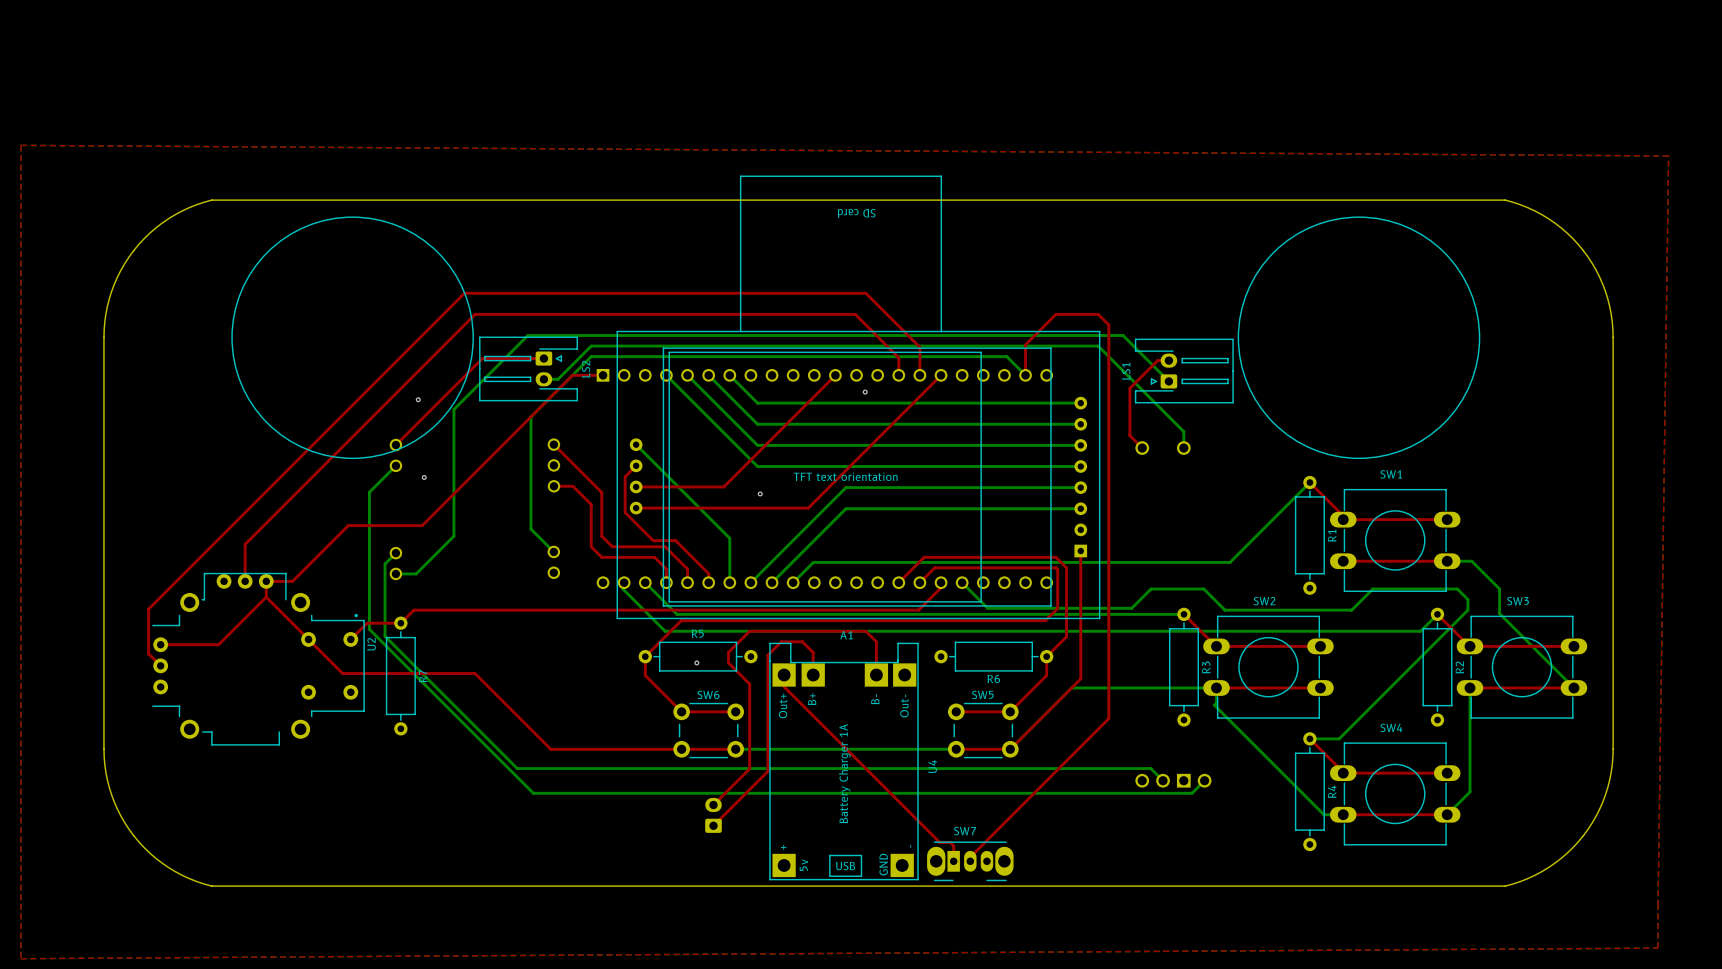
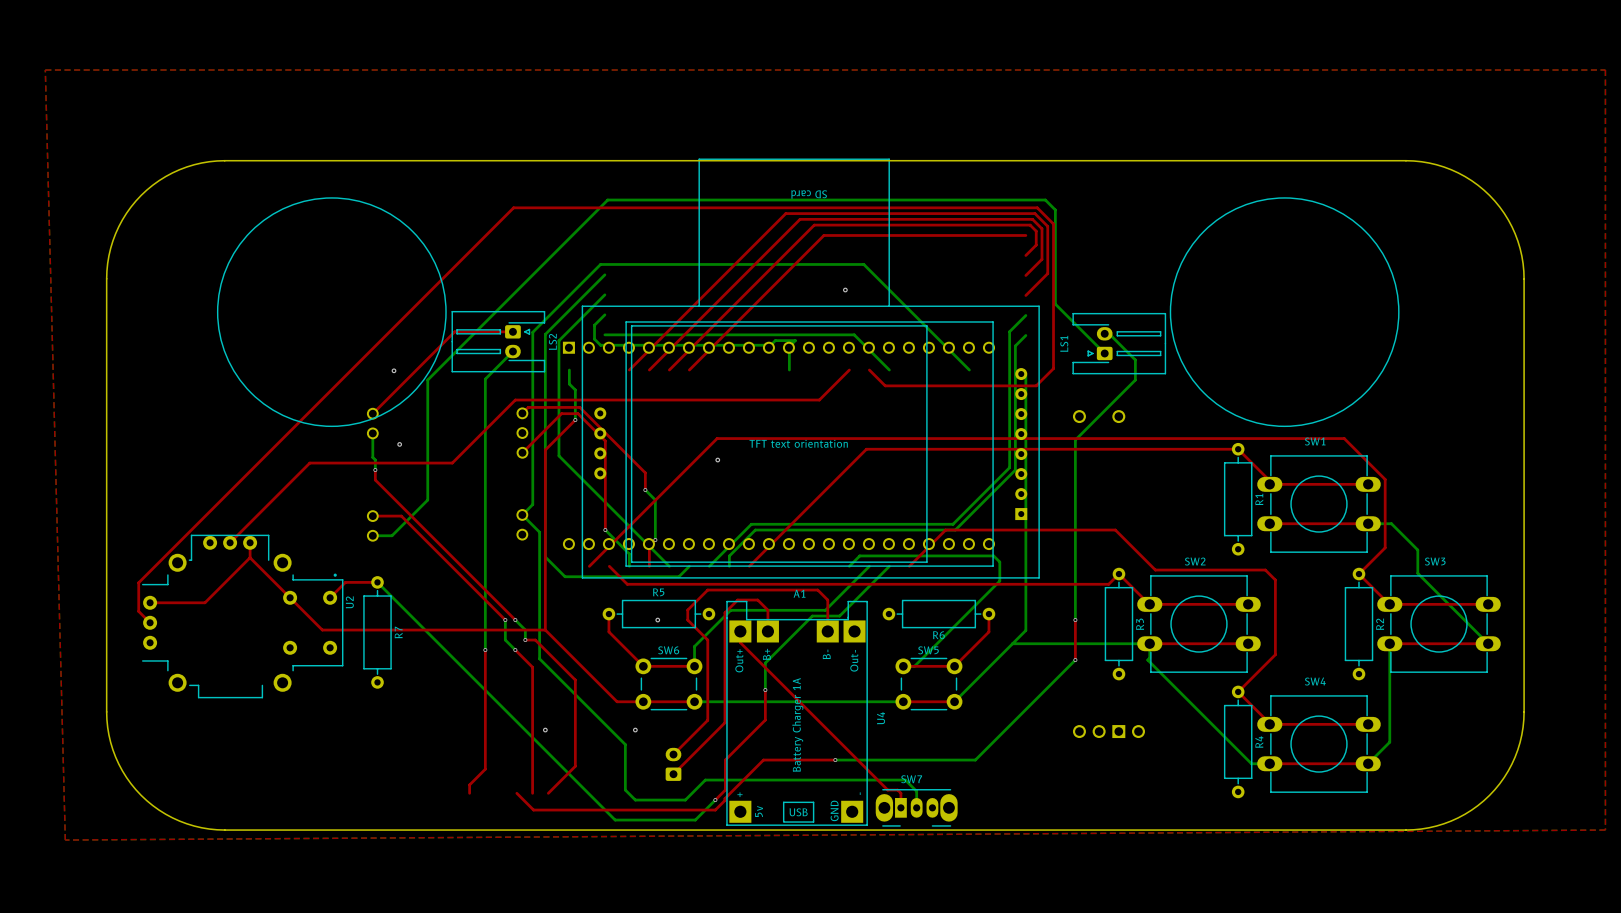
top zone outline: (20, 145) (1668, 155) (1658, 948) (20, 958) (20, 145) -> (45, 70) (65, 840) (1605, 830) (1605, 70) (45, 70)
board edge: (211, 200) (1505, 200) (1527, 207) (1561, 228) (1583, 250) (1602, 284) (1612, 321) (1613, 749) (1611, 772) (1602, 802) (1583, 835) (1561, 858) (1534, 875) (1505, 886) (211, 886) (189, 878) (161, 862) (133, 835) (117, 809) (105, 772) (103, 749) (104, 329) (107, 306) (114, 284) (124, 263) (138, 244) (155, 228) (175, 214) (211, 200) -> (224, 160) (209, 161) (186, 166) (165, 176) (146, 190) (131, 206) (118, 226) (110, 248) (106, 271) (107, 727) (112, 749) (126, 777) (146, 800) (172, 817) (201, 827) (224, 830) (1413, 829) (1443, 823) (1471, 810) (1494, 789) (1511, 764) (1521, 734) (1524, 711) (1523, 271) (1517, 241) (1504, 213) (1483, 190) (1458, 172) (1436, 164) (1405, 160) (224, 160)
top track: none -> (1025, 235) (823, 235) (689, 370)
top track: none -> (1025, 255) (1036, 245) (1036, 231) (1030, 225) (814, 225) (669, 370)
bottom track: none -> (604, 274) (545, 334) (545, 557) (565, 576) (678, 576) (689, 566)
top track: none -> (1025, 275) (1041, 259) (1041, 228) (1032, 219) (800, 219) (649, 370)
via: none -> (845, 290)
bottom track: none -> (604, 294) (558, 340) (558, 455) (669, 566)
top track: none -> (1025, 295) (1047, 273) (1047, 226) (1034, 213) (785, 213) (629, 370)
bottom track: (527, 335) (1123, 335) -> (497, 310) (607, 200) (1045, 200) (1055, 210) (1055, 304) (1061, 310)
bottom track: none -> (604, 314) (594, 325) (594, 339) (600, 345) (770, 345) (775, 340) (795, 340) (789, 346) (789, 370)
bottom track: none -> (1025, 315) (1009, 331) (1009, 467) (953, 524) (751, 524) (709, 566)
top track: (1168, 360) (1157, 360) (1129, 388) (1129, 435) (1142, 448) -> none
bottom track: none -> (1104, 333) (1109, 333) (1135, 360) (1135, 380) (1075, 440) (1075, 620)
bottom track: none -> (604, 334) (854, 334) (889, 370)
bottom track: none -> (1025, 335) (1015, 345) (1015, 470) (955, 530) (755, 530) (729, 556) (729, 566)
top track: (603, 375) (572, 375) (422, 525) (348, 525) (292, 581) (266, 581) -> none
bottom track: (666, 375) (757, 466) (1080, 466) -> none
bottom track: (687, 375) (757, 445) (1080, 445) -> none
bottom track: (708, 375) (757, 424) (1080, 424) -> none
bottom track: (729, 375) (757, 403) (1080, 403) -> none
top track: (835, 375) (723, 486) (636, 486) -> none
top track: (898, 375) (898, 357) (855, 314) (475, 314) (245, 544) (245, 581) -> (849, 370) (819, 400) (515, 400) (452, 463) (309, 463) (230, 542)
top track: (919, 375) (919, 347) (865, 293) (464, 293) (148, 609) (148, 623) -> (869, 370) (885, 385) (1036, 385) (1053, 368) (1053, 224) (1037, 207) (513, 207) (138, 582)
top track: (941, 375) (808, 508) (636, 508) -> none
top track: (1025, 375) (1025, 344) (1055, 314) (1098, 314) (1108, 324) (1108, 718) (970, 857) (970, 861) -> none
bottom track: (1025, 375) (1006, 356) (591, 356) (530, 416) (530, 529) (553, 551) -> none
bottom track: (543, 379) (557, 379) (591, 346) (1098, 346) (1183, 431) (1183, 448) -> (512, 351) (485, 379) (485, 650)
via: (865, 392) -> none
bottom track: none -> (569, 370) (569, 384) (575, 390) (575, 420)
bottom track: none -> (969, 370) (863, 264) (600, 264) (532, 332) (532, 504) (522, 514) (539, 532) (539, 658) (625, 744) (625, 790) (635, 800) (685, 800) (705, 780) (905, 780) (916, 791) (916, 807)
bottom track: none -> (1025, 375) (1025, 630) (1012, 643)
top track: (553, 444) (601, 492) (601, 536) (612, 546) (665, 546) (687, 569) (687, 582) -> (522, 413) (528, 407) (579, 407) (645, 472) (645, 490)
bottom track: (636, 444) (729, 538) (729, 582) -> none
top track: none -> (575, 420) (545, 450) (545, 630)
via: none -> (575, 420)
bottom track: (395, 465) (369, 492) (369, 629) (533, 793) (1192, 793) (1204, 780) -> (372, 433) (372, 457) (375, 460) (375, 470)
top track: (636, 465) (625, 476) (625, 512) (653, 540) (675, 540) (708, 573) (708, 582) -> none
top track: none -> (1238, 449) (866, 449) (749, 566)
bottom track: (1309, 482) (1230, 562) (813, 562) (793, 582) -> none
top track: (553, 486) (573, 486) (591, 504) (591, 546) (601, 557) (654, 557) (666, 569) (666, 582) -> (522, 452) (561, 413) (577, 413) (605, 441) (605, 530)
bottom track: (1080, 487) (845, 487) (750, 582) -> none
top track: none -> (375, 470) (375, 480) (515, 620)
via: none -> (375, 470)
bottom track: (1080, 508) (845, 508) (772, 582) -> none
bottom track: none -> (645, 490) (655, 500) (655, 540)
via: none -> (645, 490)
top track: (1080, 551) (1080, 678) (1014, 744) -> none
top track: none -> (372, 516) (401, 516) (505, 620)
bottom track: (395, 553) (385, 564) (385, 636) (517, 768) (1150, 768) (1163, 780) -> none
bottom track: none -> (605, 530) (629, 554) (629, 566)
via: none -> (605, 530)
top track: (1000, 567) (934, 567) (919, 582) -> (945, 530) (909, 566)
top track: (1055, 567) (1057, 569) (1057, 608) (1045, 620) (681, 620) (645, 656) -> (997, 530) (1115, 530) (1155, 570) (1265, 570) (1275, 580) (1275, 654) (1238, 691)
top track: none -> (655, 540) (649, 546) (649, 566)
via: none -> (655, 540)
bottom track: (624, 582) (622, 589) (665, 631) (1420, 631) (1437, 614) -> none
bottom track: (645, 582) (676, 614) (1183, 614) -> none
top track: (898, 582) (924, 557) (1055, 557) (1066, 567) (1066, 636) (1046, 656) -> none
top track: (941, 582) (941, 587) (918, 610) (413, 610) (400, 623) -> none
bottom track: (962, 582) (987, 608) (1131, 608) (1151, 589) (1203, 589) (1224, 610) (1351, 610) (1372, 589) (1457, 589) (1467, 599) (1467, 610) (1339, 738) (1309, 738) -> none
top track: none -> (589, 566) (717, 438) (1344, 438) (1385, 479) (1385, 547) (1358, 574)
top track: none -> (609, 566) (627, 584) (1108, 584) (1118, 574)
bottom track: none -> (849, 566) (859, 555) (993, 555) (999, 562) (999, 581) (914, 666) (903, 666)
bottom track: none -> (869, 566) (825, 610) (730, 610) (694, 646) (694, 666)
bottom track: none -> (889, 566) (839, 616) (812, 616) (765, 663) (765, 690)
bottom track: none -> (377, 582) (615, 820) (695, 820) (715, 800)
bottom track: none -> (505, 620) (505, 640) (515, 650)
via: none -> (505, 620)
bottom track: none -> (515, 620) (525, 630) (525, 640)
via: none -> (515, 620)
top track: none -> (1075, 620) (1075, 660)
via: none -> (1075, 620)
top track: (475, 673) (550, 749) (653, 749) -> (545, 630) (617, 701)
top track: none -> (447, 630) (545, 630)
top track: none -> (525, 640) (535, 640) (575, 680) (575, 766) (548, 793)
via: none -> (525, 640)
top track: none -> (485, 650) (485, 769) (469, 784) (469, 793)
via: none -> (485, 650)
top track: none -> (515, 650) (532, 667) (532, 793)
via: none -> (515, 650)
bottom track: none -> (1075, 660) (975, 760) (835, 760)
via: none -> (1075, 660)
top track: none -> (765, 690) (765, 720) (725, 760) (725, 790) (715, 800)
via: none -> (765, 690)
via: none -> (545, 730)
via: none -> (635, 730)
top track: none -> (835, 760) (763, 760) (715, 810) (533, 810) (516, 793)
via: none -> (835, 760)
via: none -> (715, 800)

